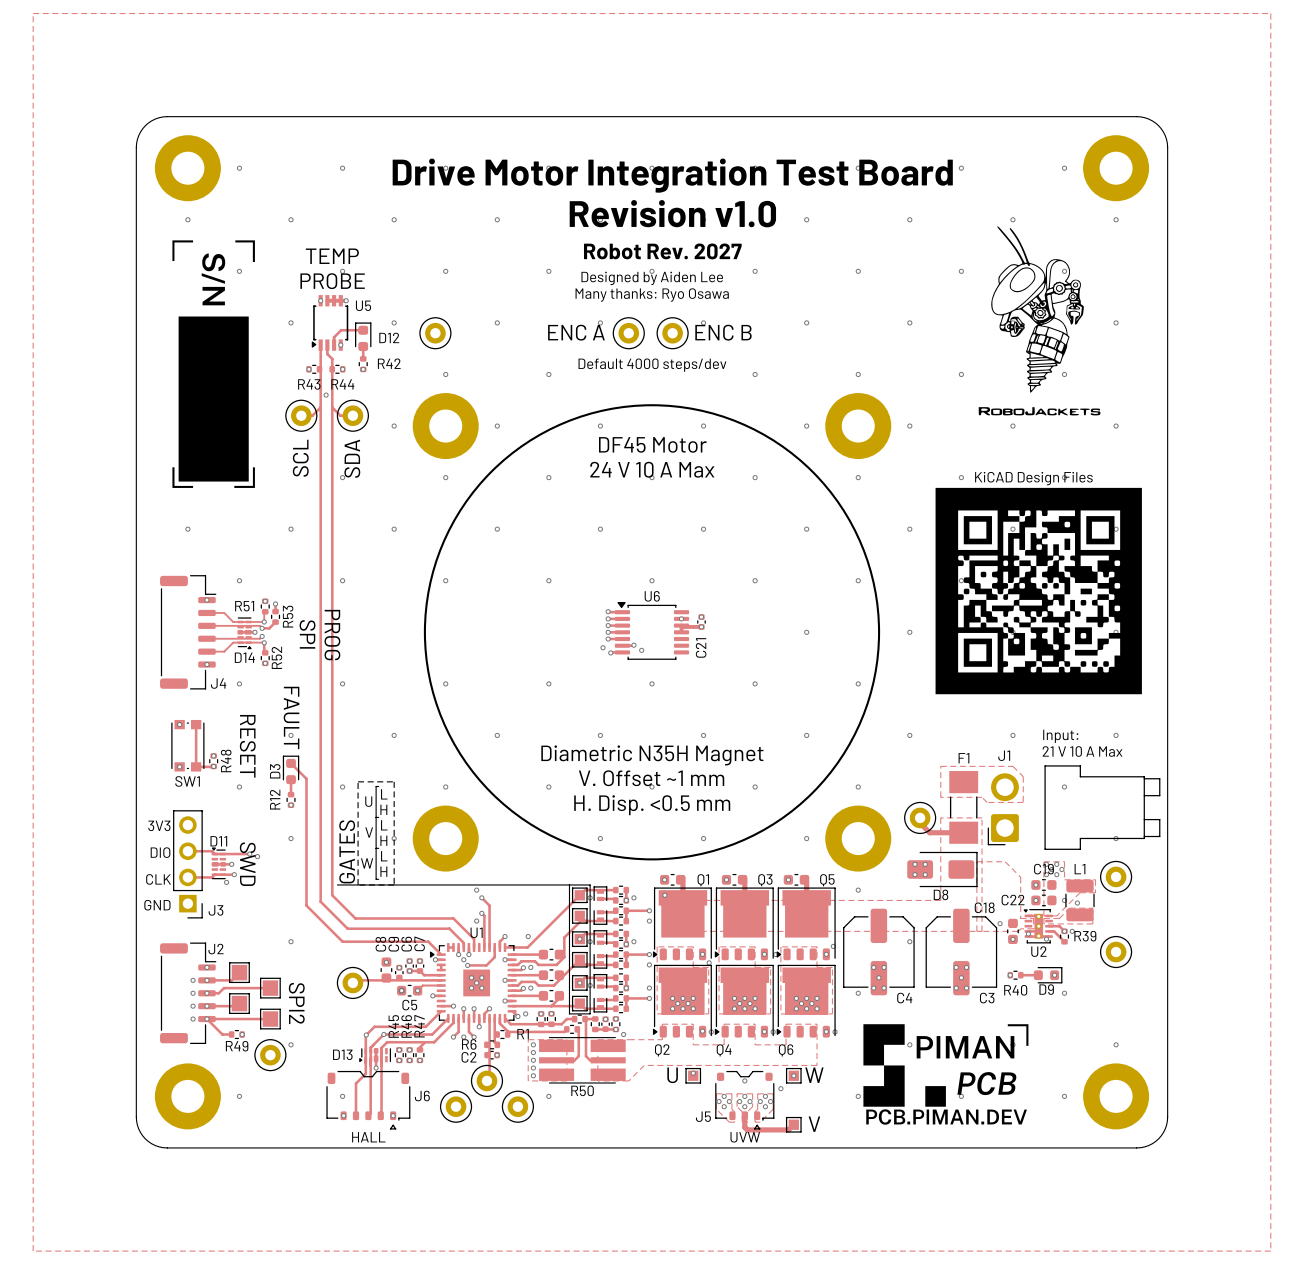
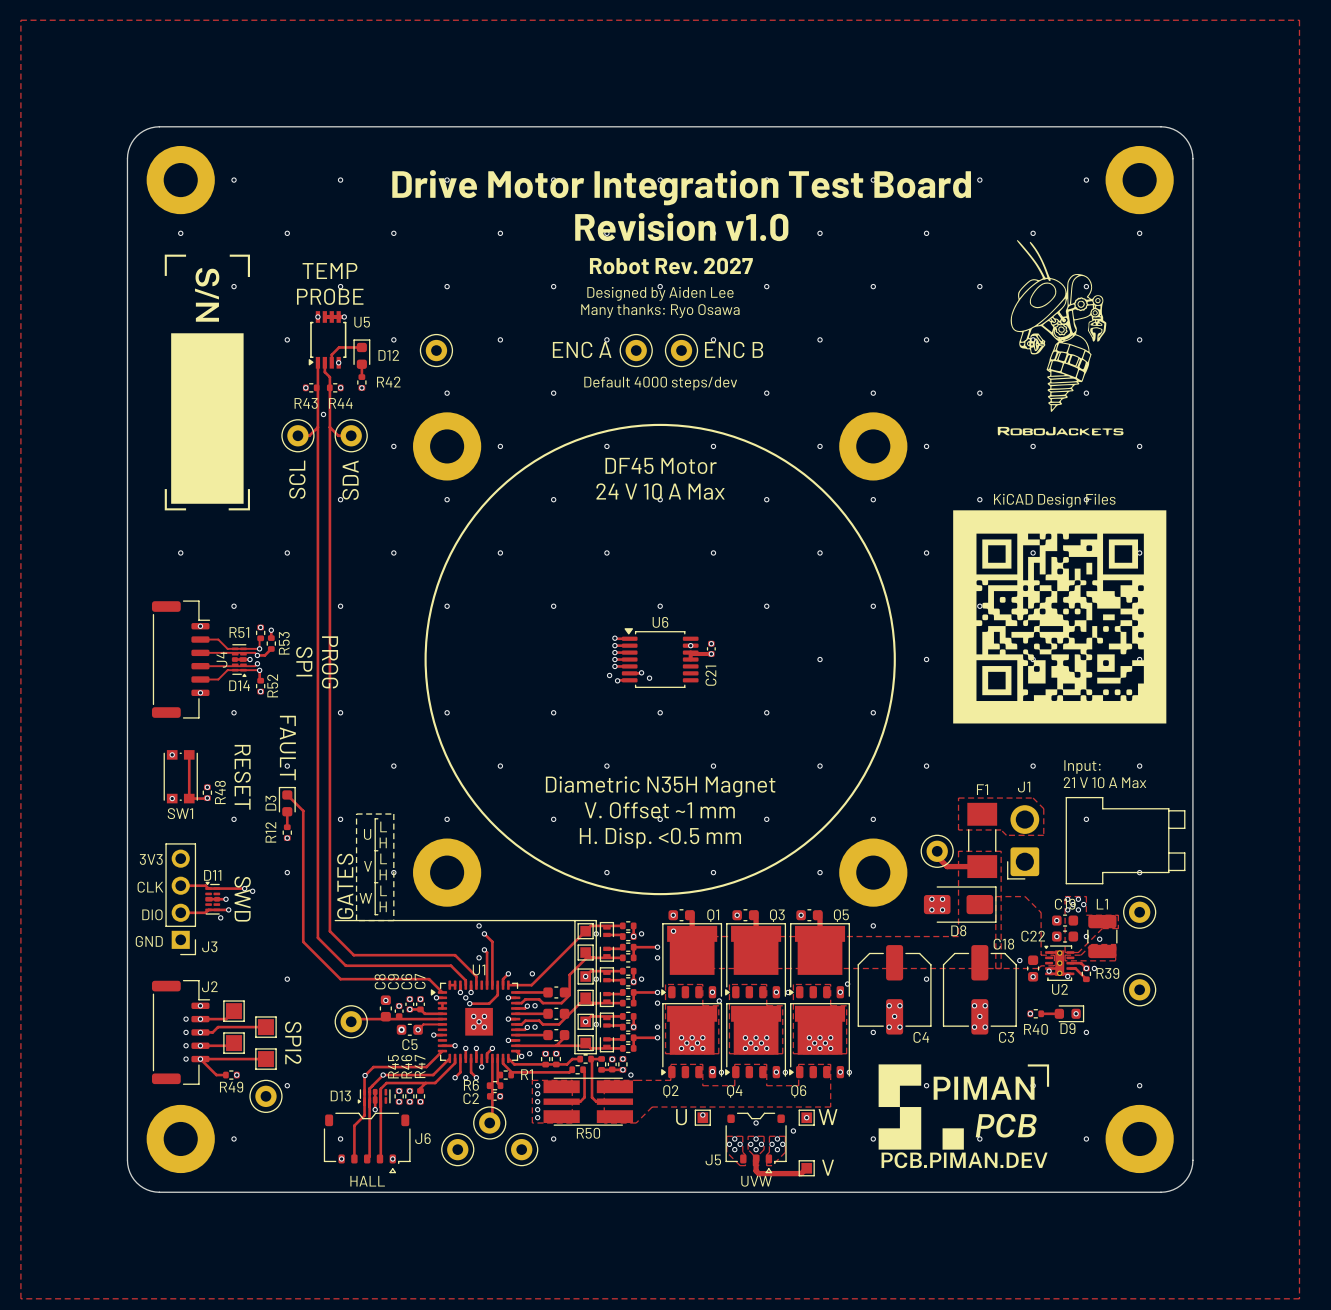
J4 name rotation: 0° (218, 683) -> 90° counterclockwise (221, 659)
J4 name position: J4 (218, 683) -> J4 (221, 659)
text: DIO (160, 852) -> CLK (150, 887)
text: CLK (158, 879) -> DIO (152, 914)

